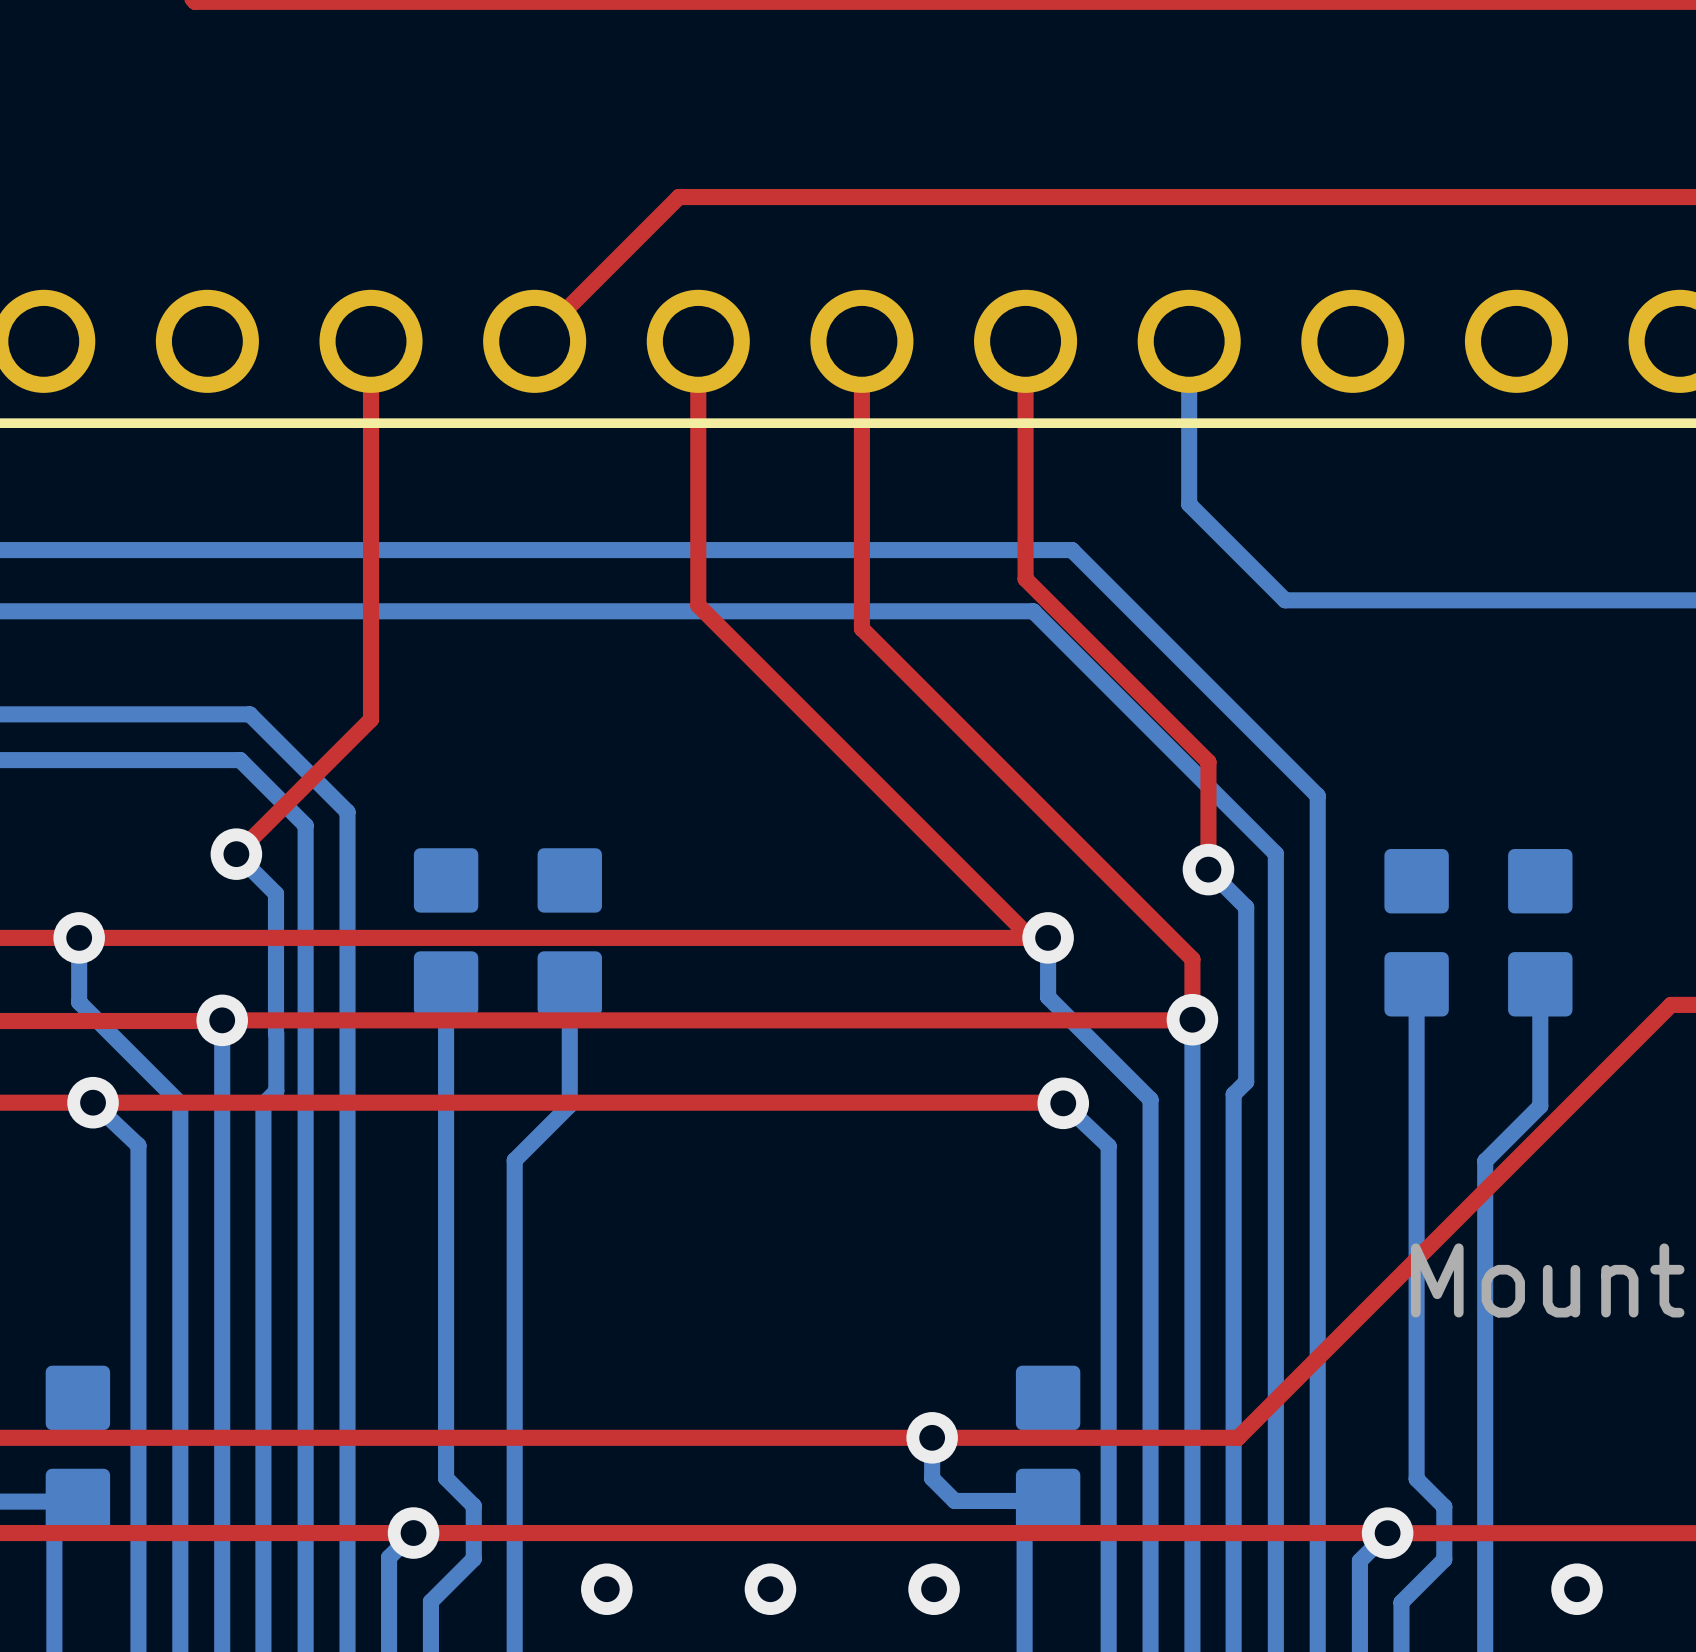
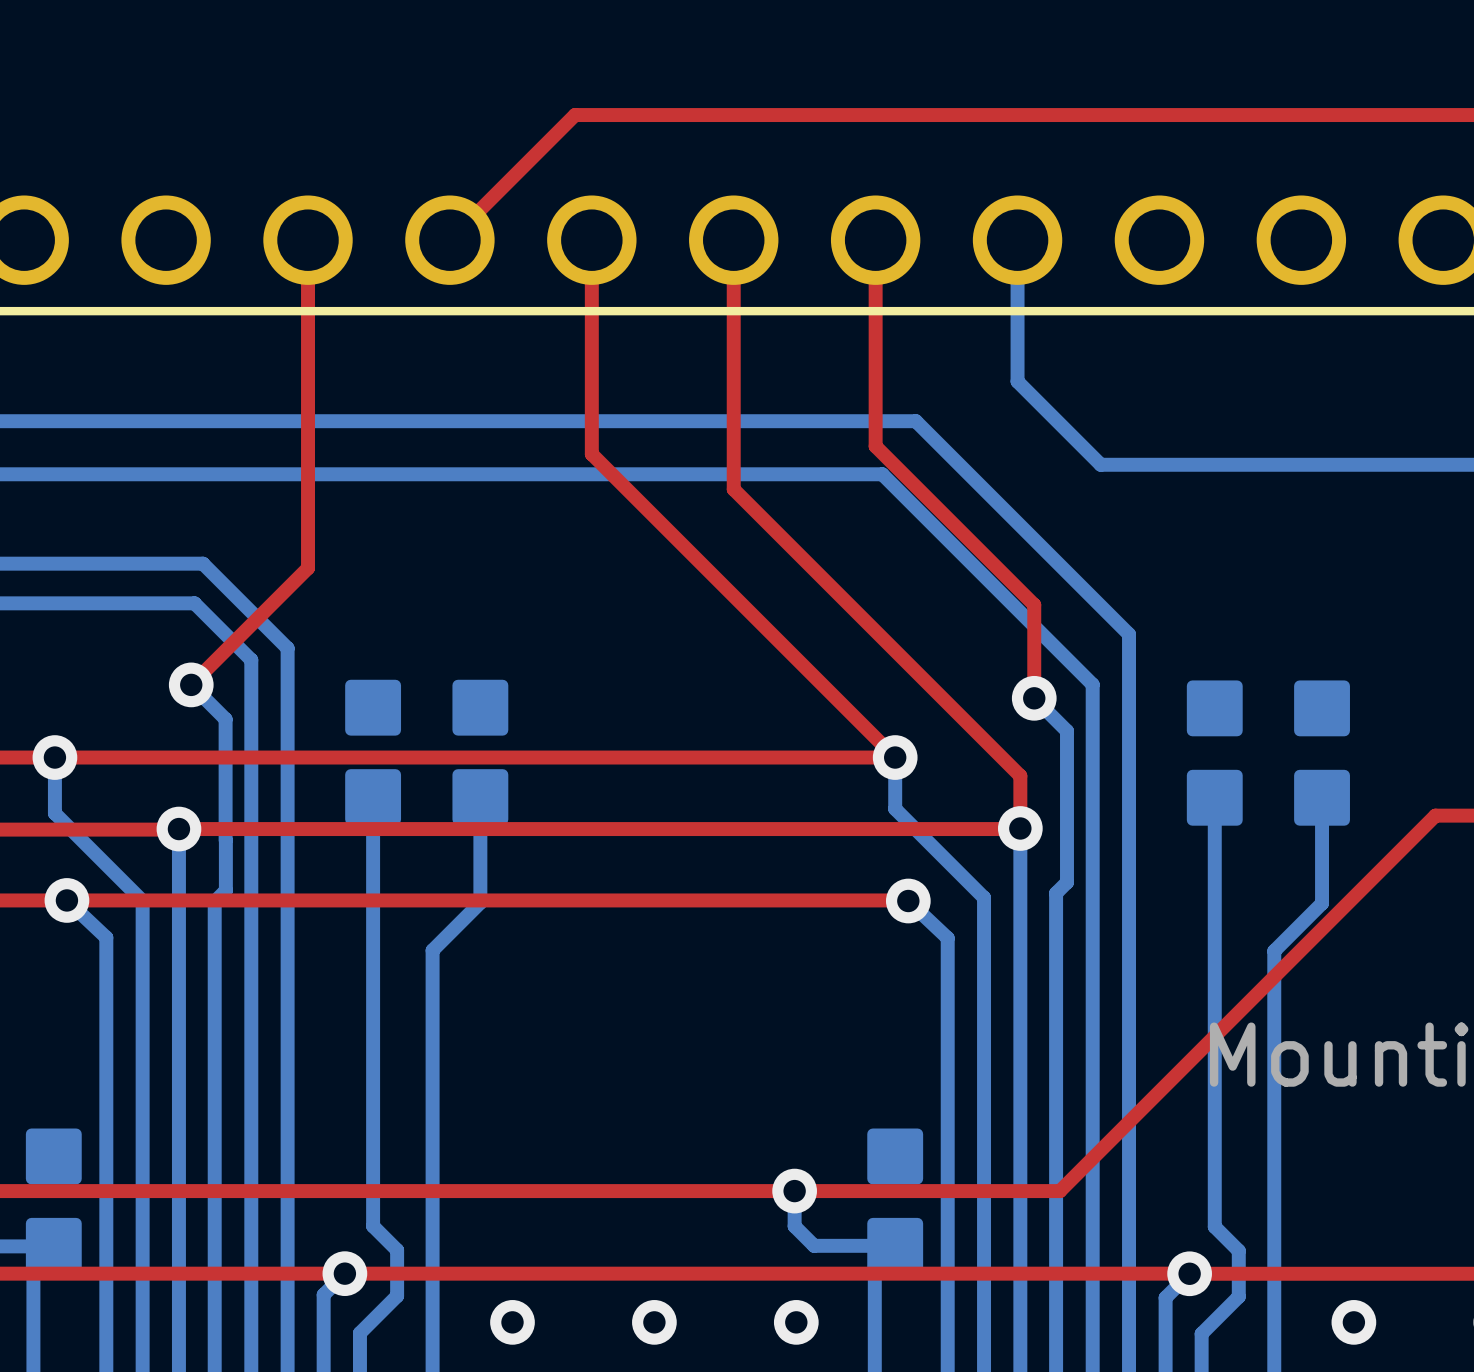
top track: (698, 588) (698, 605) (1030, 937) -> (591, 454) (895, 757)

